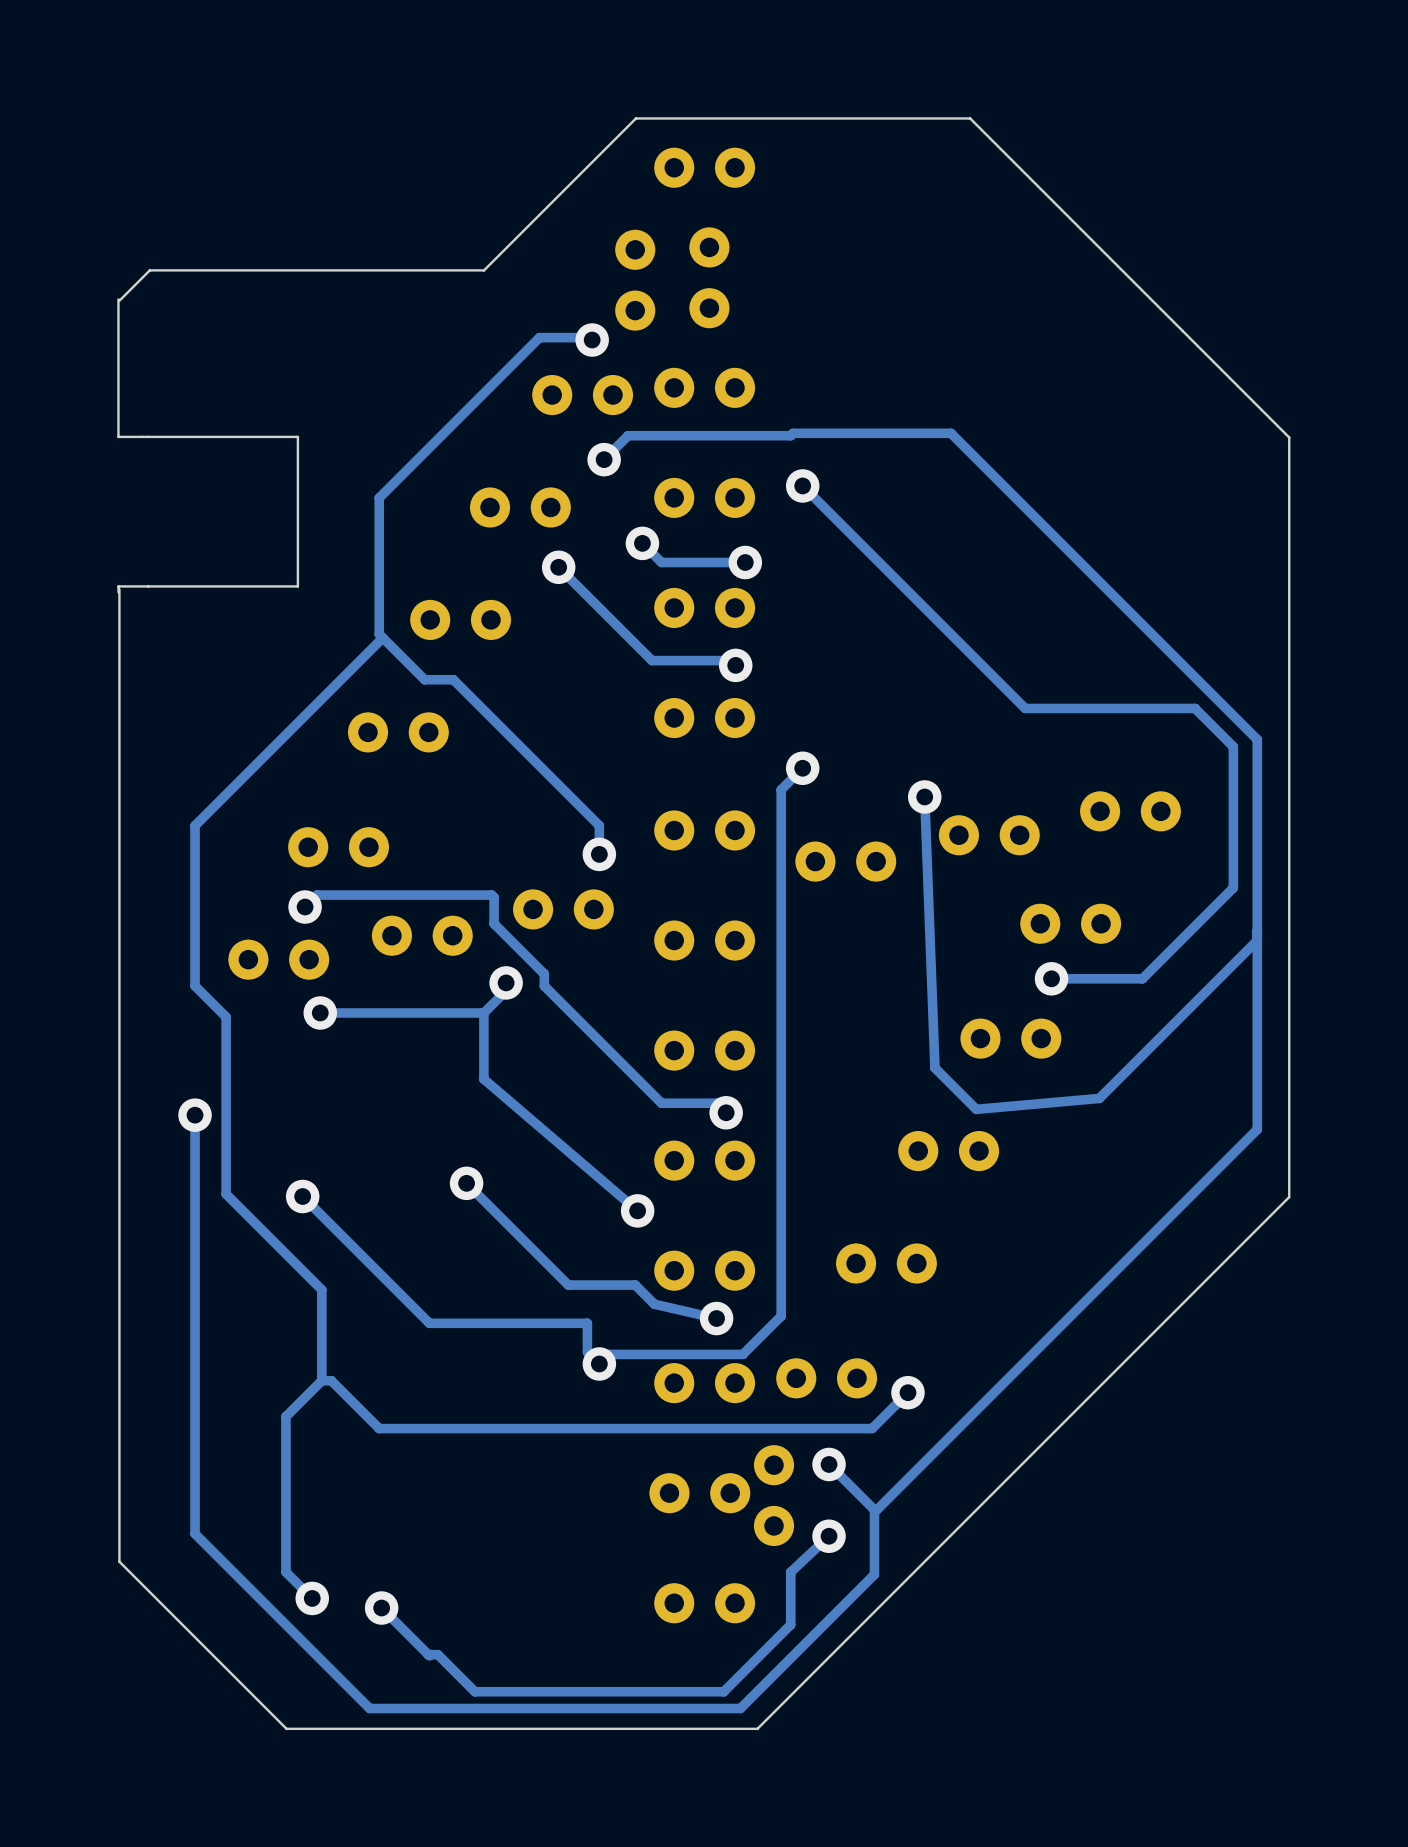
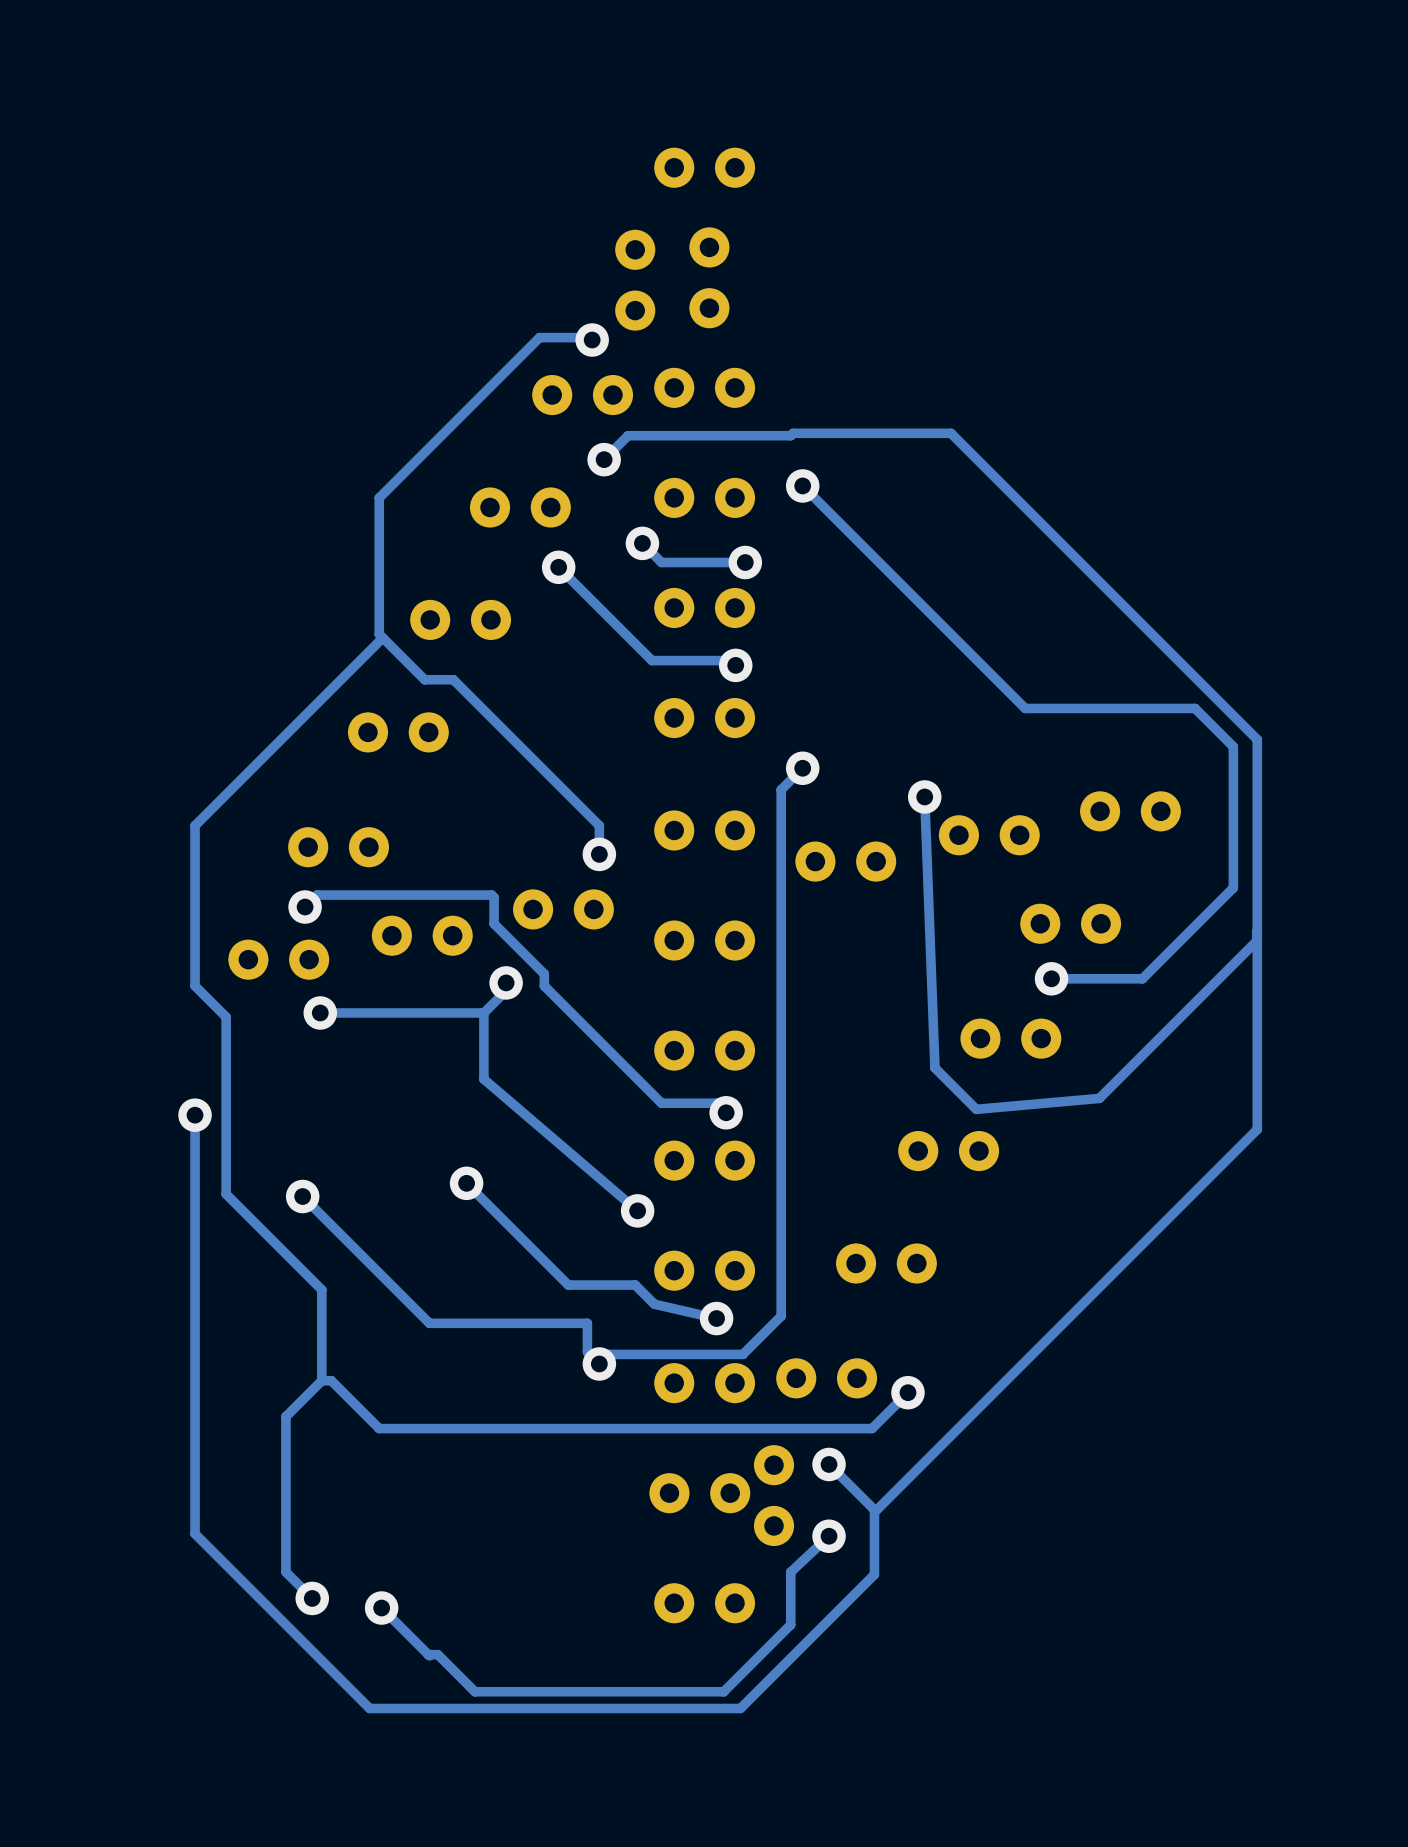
board edge: (118, 299) (118, 436) (297, 436) (297, 586) (118, 586) (118, 592) -> none
board edge: (119, 300) (149, 270) (484, 270) (635, 118) (970, 118) (1289, 437) (1289, 1197) (757, 1728) (286, 1728) (119, 1561) (119, 589) -> none

